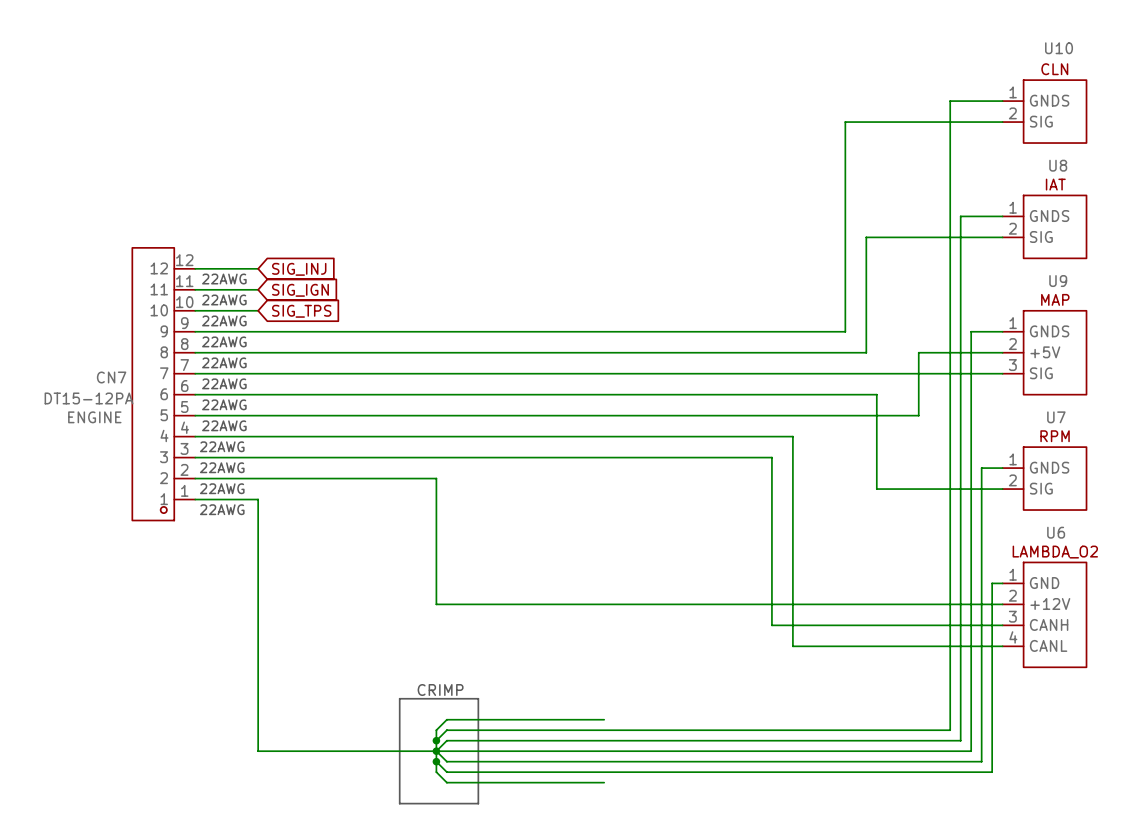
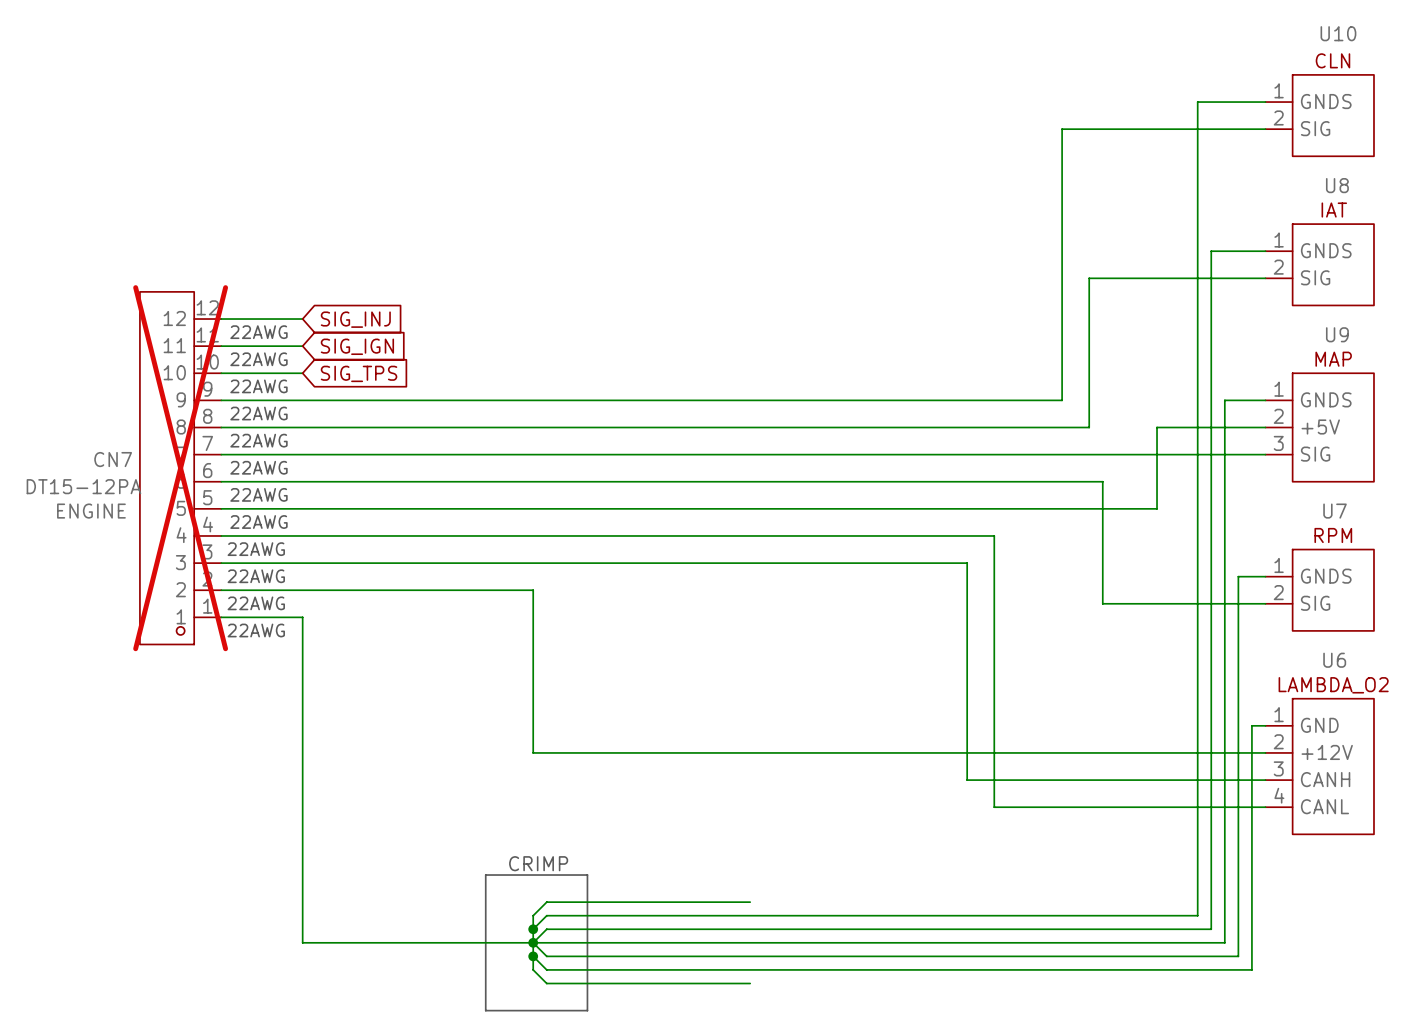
CN7 do-not-place cross: none -> (180, 468)

